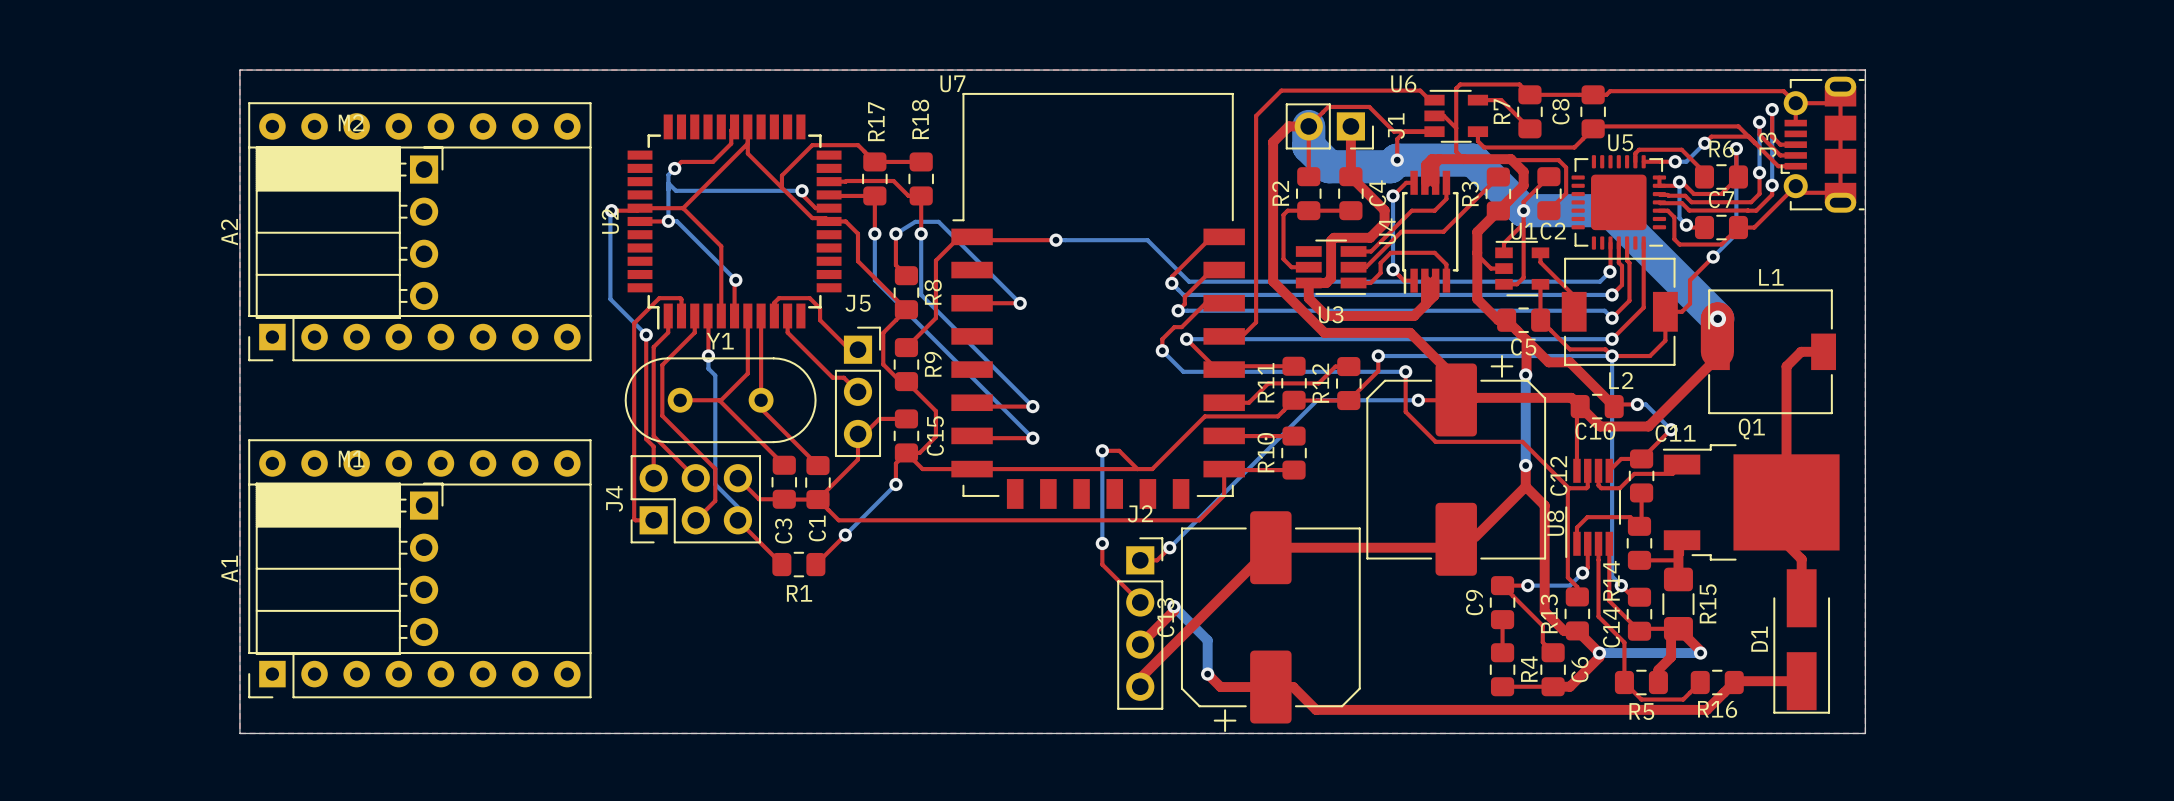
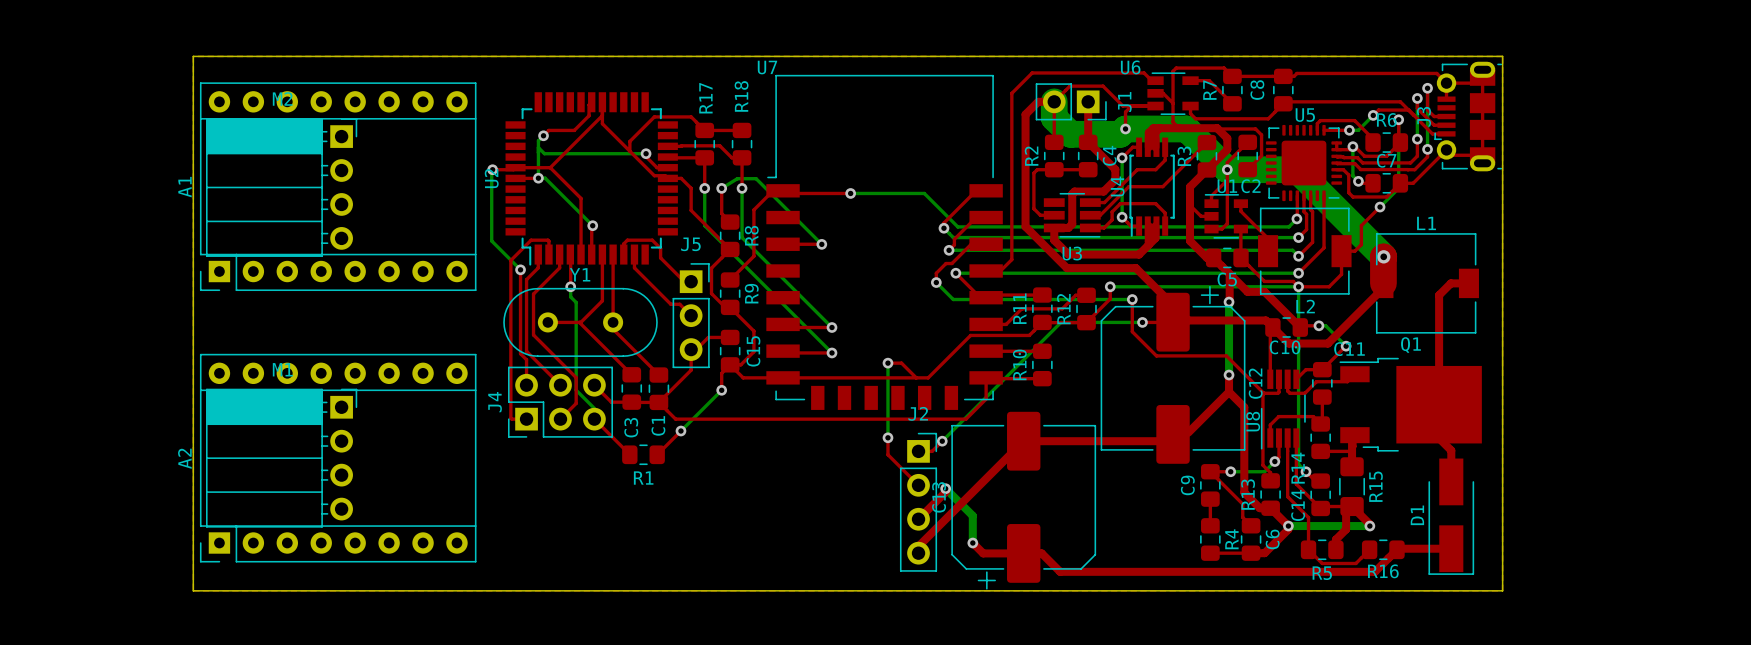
A2 name: A2 (229, 232) -> A1 (185, 187)
A1 name: A1 (229, 568) -> A2 (184, 458)

